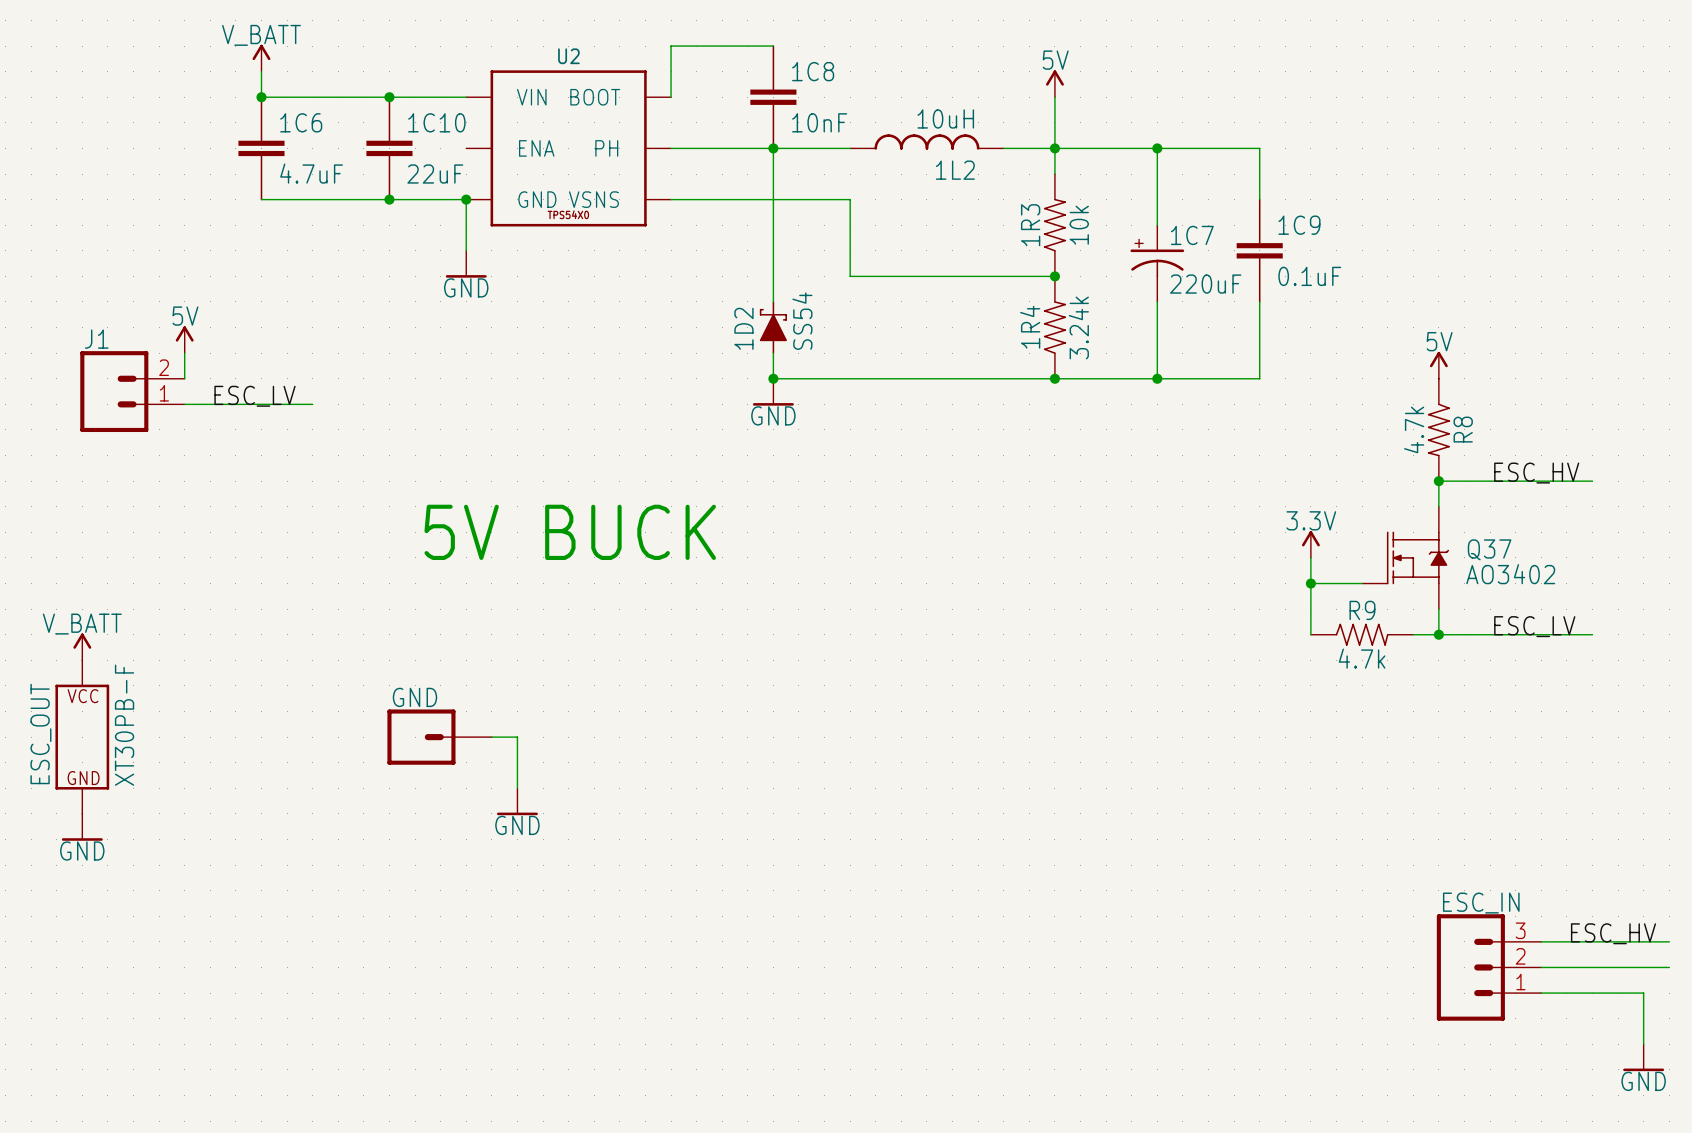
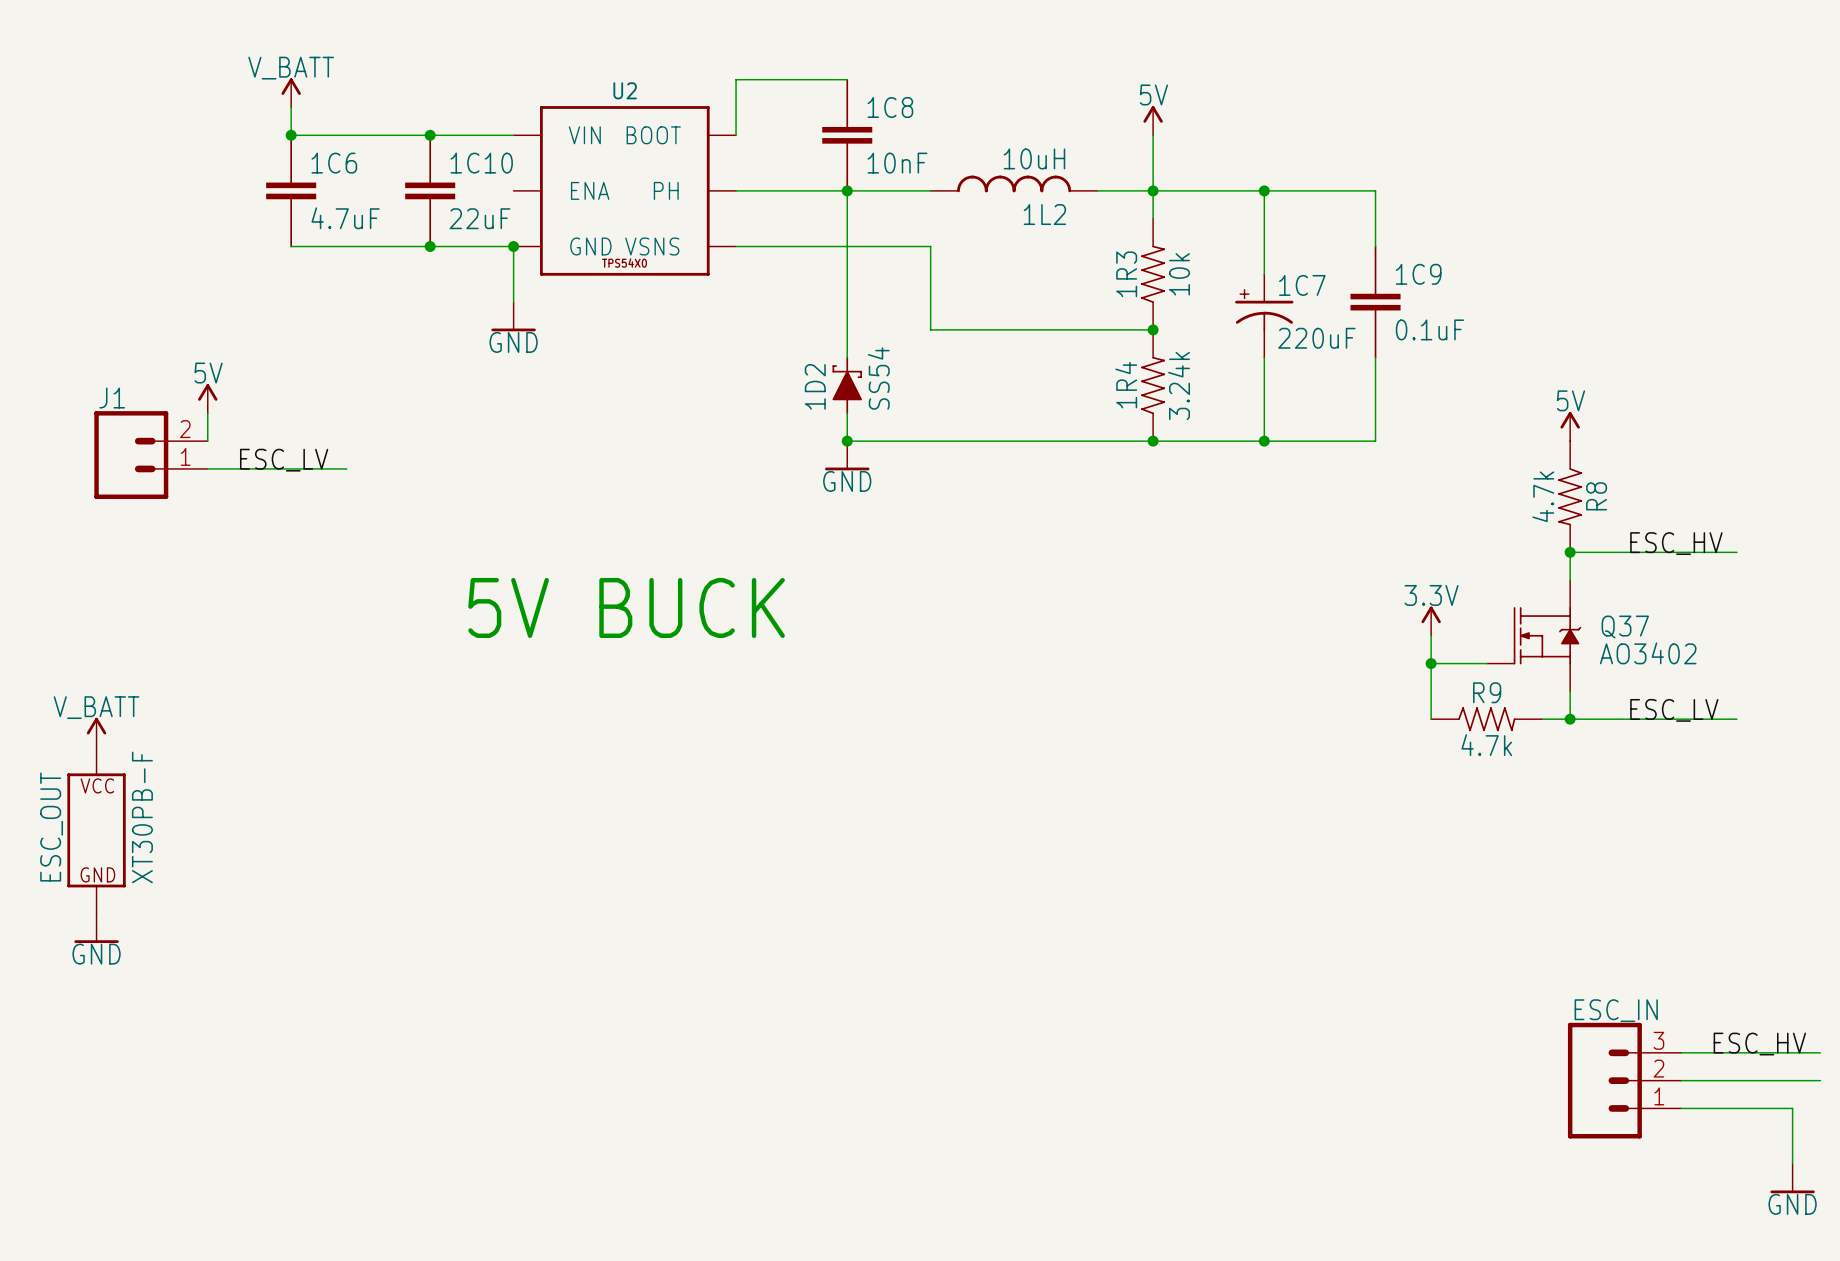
GND: (439, 737) -> none
wire: (491, 737) (517, 737) (517, 788) -> none
power symbol: GND (517, 801) -> none

